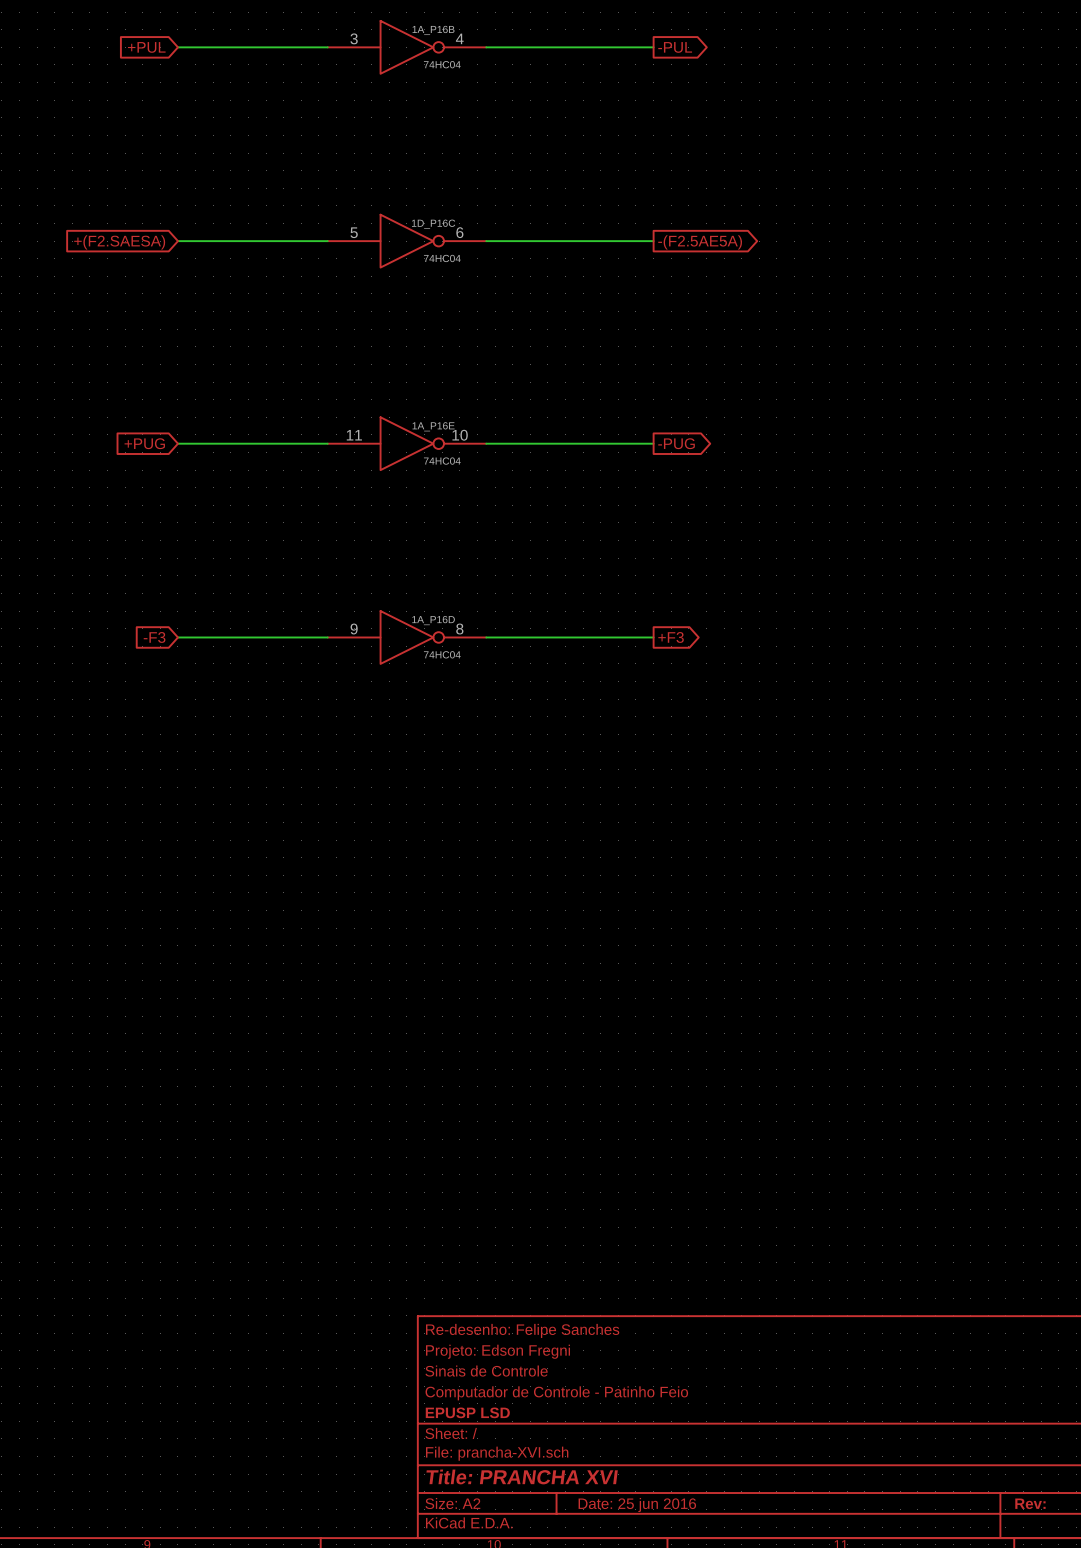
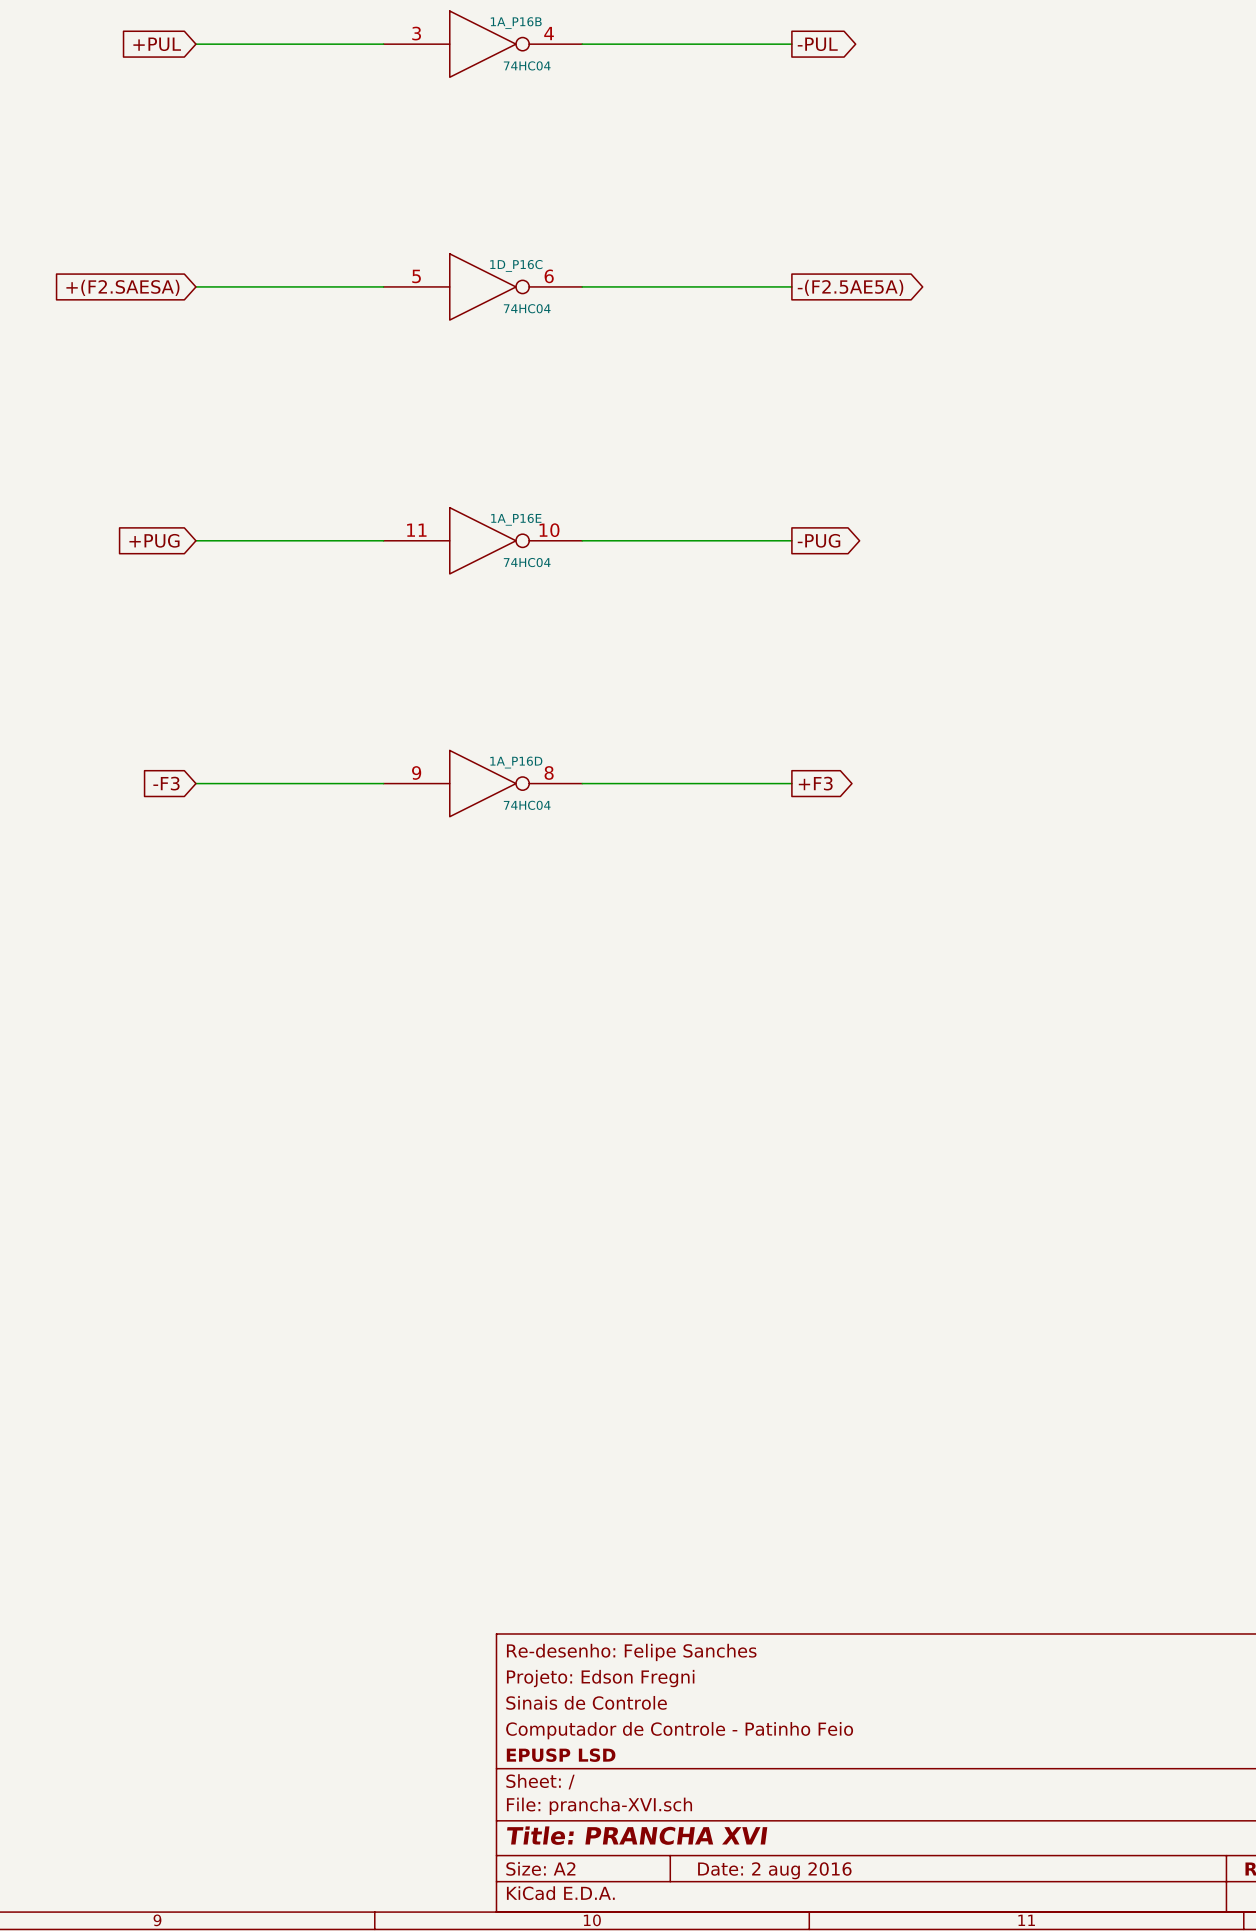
title block: Date: 25 jun 2016 (637, 1505) -> Date: 2 aug 2016 (774, 1870)

